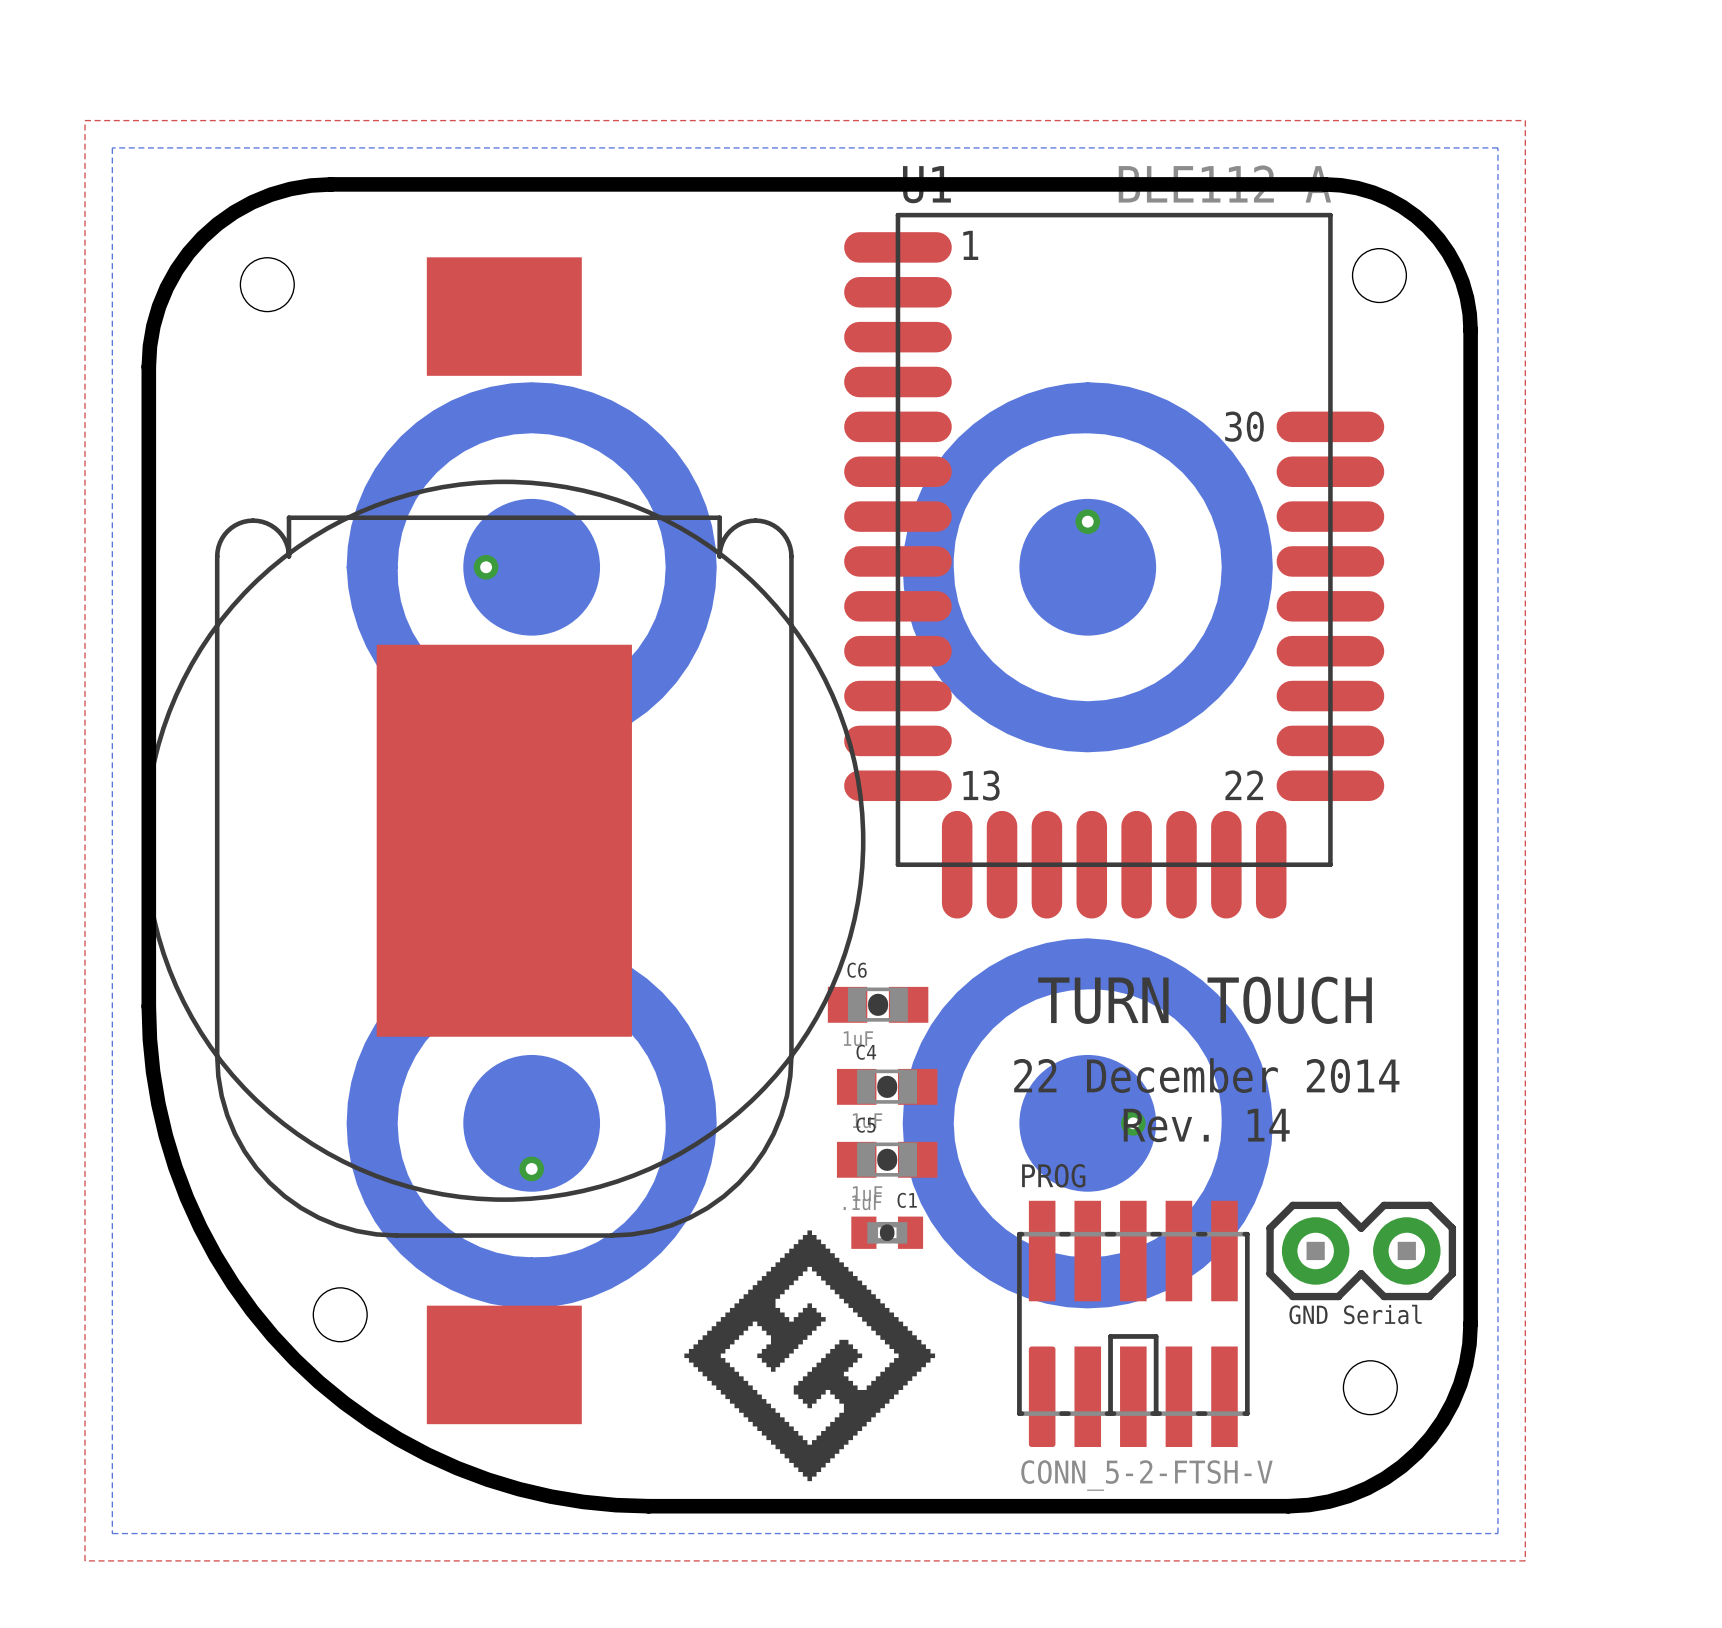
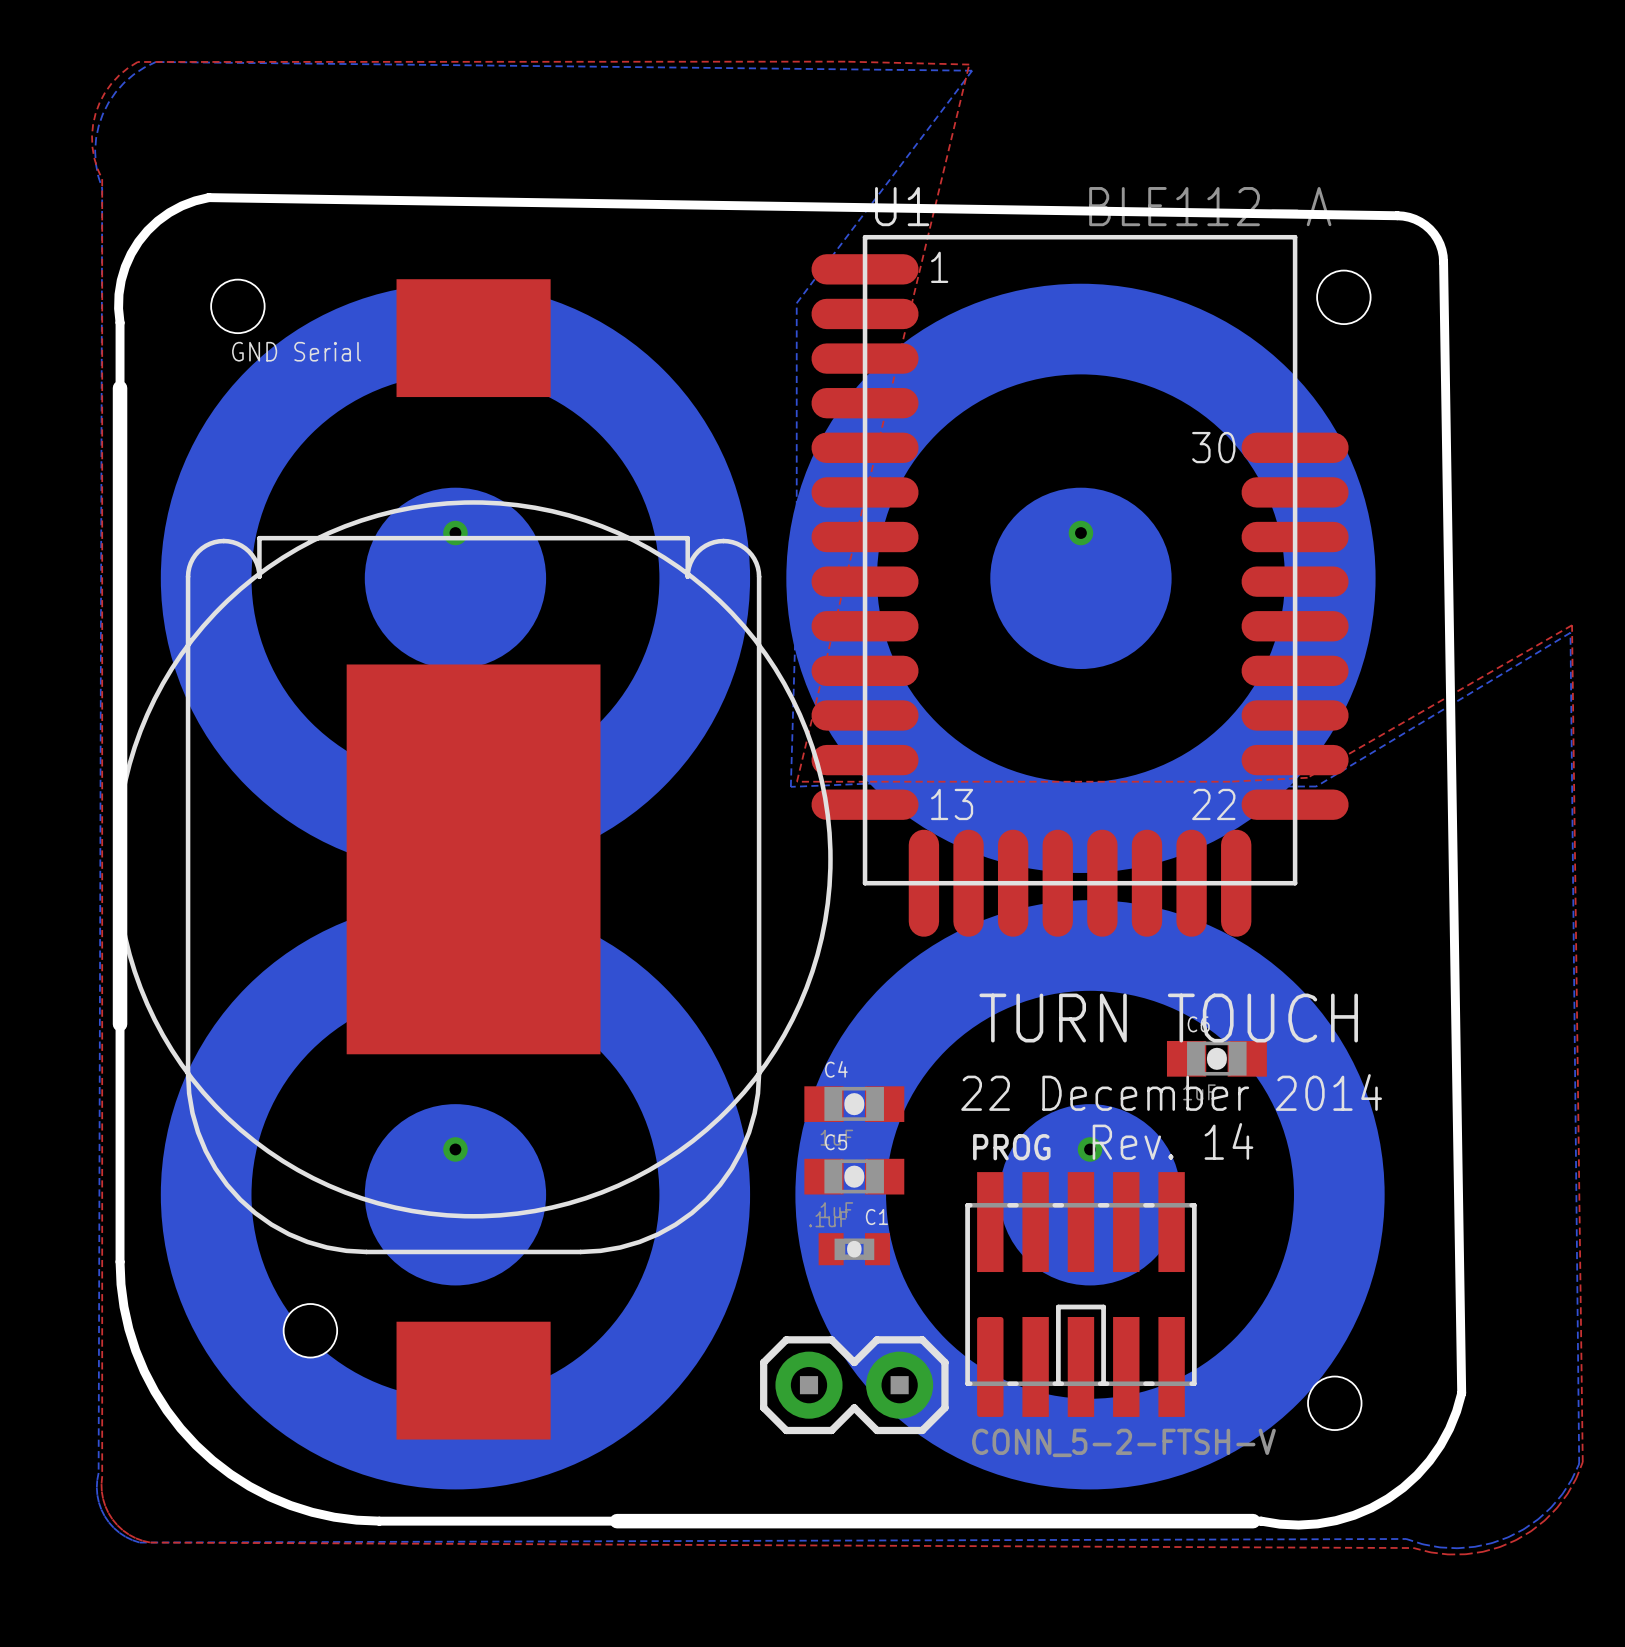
top zone outline: (84, 120) (1525, 120) (1525, 1560) (84, 1560) (84, 120) -> (845, 61) (137, 61) (119, 75) (99, 102) (92, 135) (94, 157) (102, 179) (101, 1484) (103, 1499) (108, 1513) (123, 1530) (135, 1538) (150, 1542) (1413, 1548) (1448, 1554) (1465, 1554) (1499, 1547) (1531, 1531) (1557, 1507) (1576, 1478) (1582, 1462) (1572, 625) (1307, 777) (1229, 781) (797, 781) (969, 64) (845, 61)
bottom zone outline: (112, 147) (1497, 147) (1497, 1533) (112, 1533) (112, 147) -> (155, 61) (133, 74) (124, 82) (108, 102) (98, 125) (95, 151) (95, 163) (102, 188) (98, 1472) (96, 1487) (101, 1509) (113, 1528) (125, 1536) (139, 1542) (1406, 1538) (1440, 1547) (1457, 1548) (1491, 1543) (1508, 1537) (1538, 1519) (1551, 1507) (1571, 1479) (1579, 1463) (1570, 632) (1316, 786) (931, 786) (886, 782) (790, 786) (796, 587) (796, 303) (972, 70) (155, 61)
text: none -> GND Serial (296, 351)
board edge: (148, 366) (153, 326) (166, 287) (176, 269) (202, 237) (234, 212) (252, 202) (270, 194) (310, 185) (1324, 184) (1357, 188) (1372, 192) (1402, 206) (1427, 227) (1448, 252) (1462, 282) (1466, 297) (1470, 330) (1469, 1344) (1460, 1384) (1452, 1403) (1442, 1420) (1417, 1452) (1385, 1478) (1367, 1488) (1328, 1501) (1288, 1506) -> (120, 387) (118, 294) (125, 266) (131, 253) (138, 241) (157, 221) (181, 205) (208, 197) (1397, 215) (1415, 219) (1430, 229) (1440, 244) (1443, 261) (1461, 1393) (1449, 1428) (1440, 1445) (1417, 1475) (1387, 1498) (1354, 1515) (1317, 1523) (1298, 1525) (1253, 1521)
part footprint: [902, 382, 1273, 753] -> [786, 283, 1376, 873]
part: none -> (455, 578)
part: (531, 567) -> none
C6 position: (878, 1004) -> (1216, 1058)
board edge: (148, 1006) (153, 1071) (158, 1103) (175, 1167) (186, 1197) (200, 1227) (233, 1284) (272, 1335) (295, 1359) (319, 1382) (370, 1421) (427, 1454) (457, 1468) (487, 1479) (551, 1496) (583, 1501) (648, 1506) -> (120, 1024) (120, 1261) (123, 1306) (128, 1328) (144, 1371) (166, 1410) (195, 1445) (230, 1474) (269, 1496) (312, 1512) (334, 1517) (379, 1521) (616, 1521)
part: (531, 1123) -> none
part: (1087, 1123) -> none
part: none -> (455, 1194)
part: none -> (1090, 1194)
drawing: [684, 1230, 936, 1482] -> none
part position: (1361, 1250) -> (854, 1385)
text: GND Serial (1355, 1314) -> none
PROG position: (1133, 1323) -> (1080, 1294)

